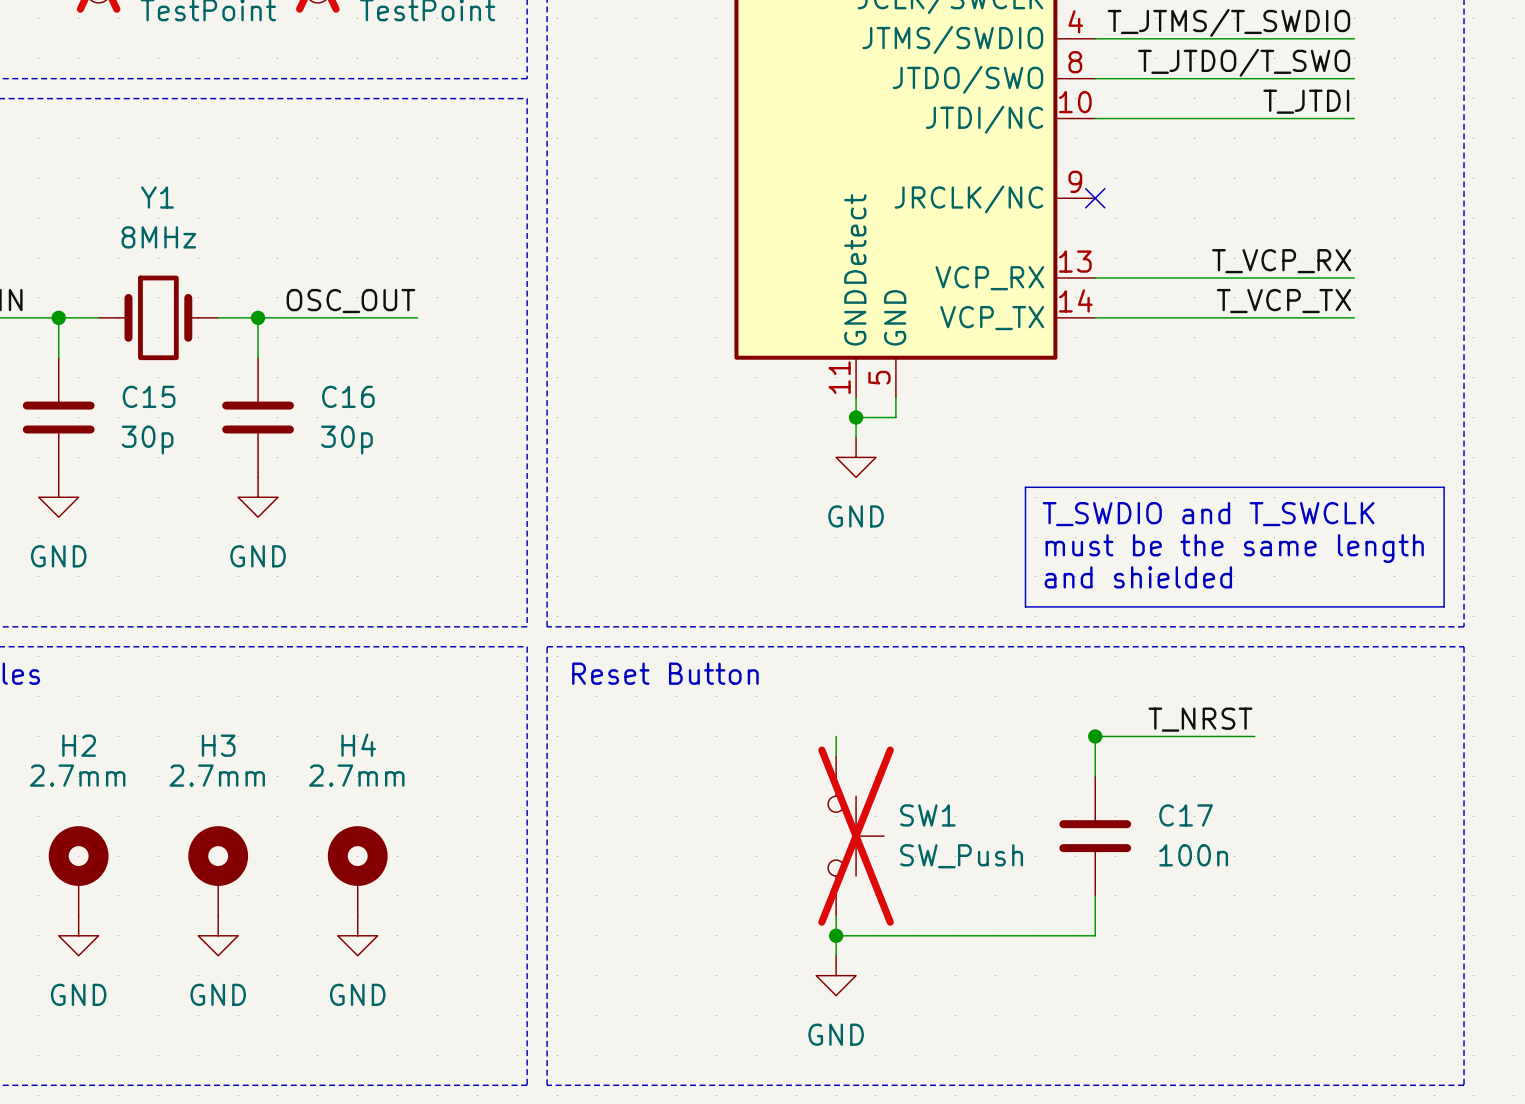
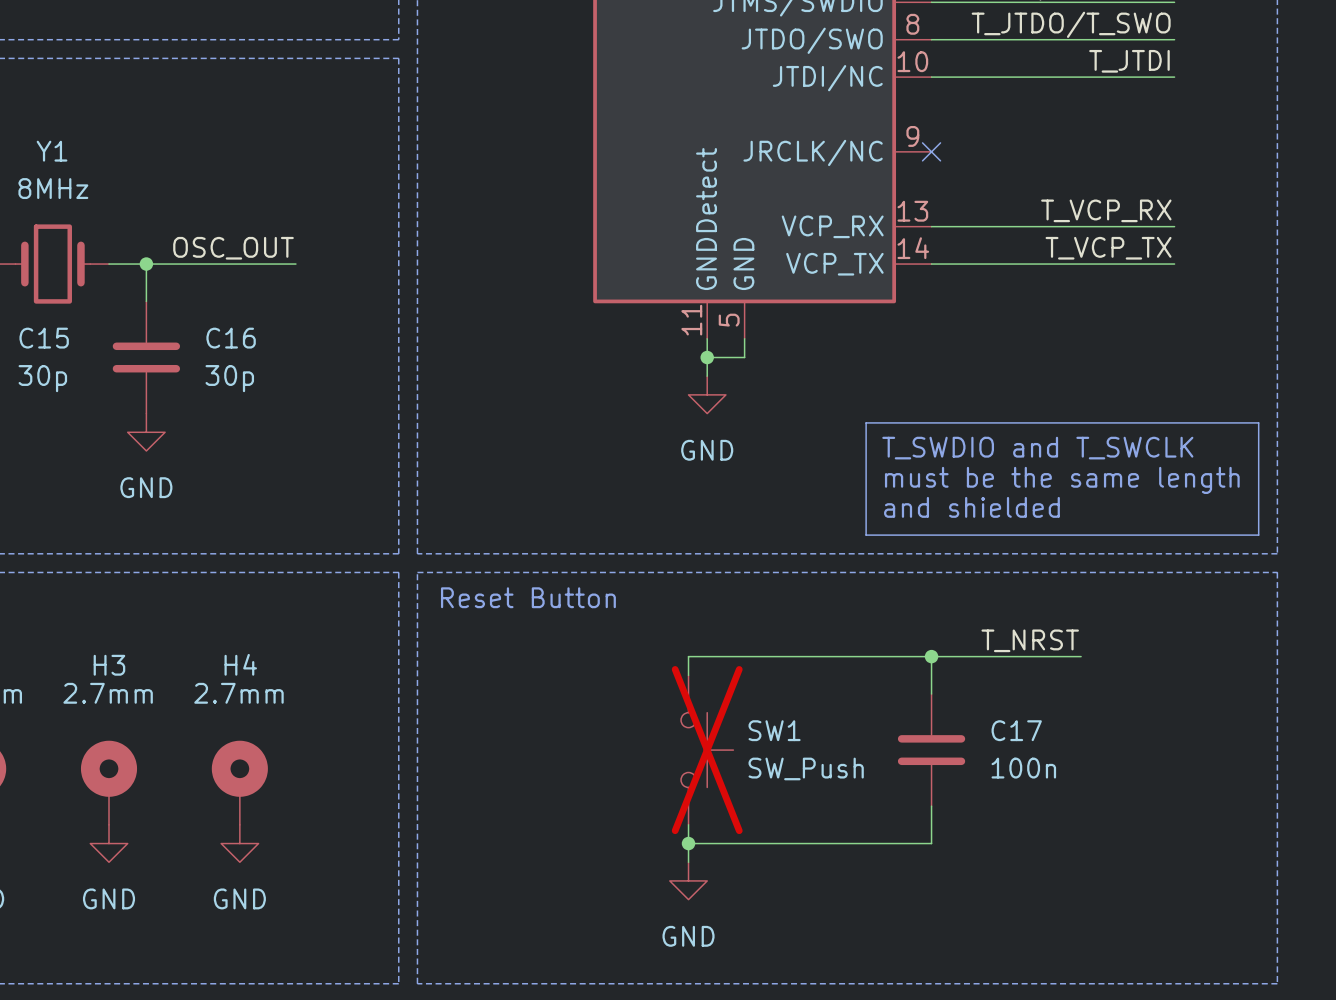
wire: none -> (688, 656) (931, 656)

